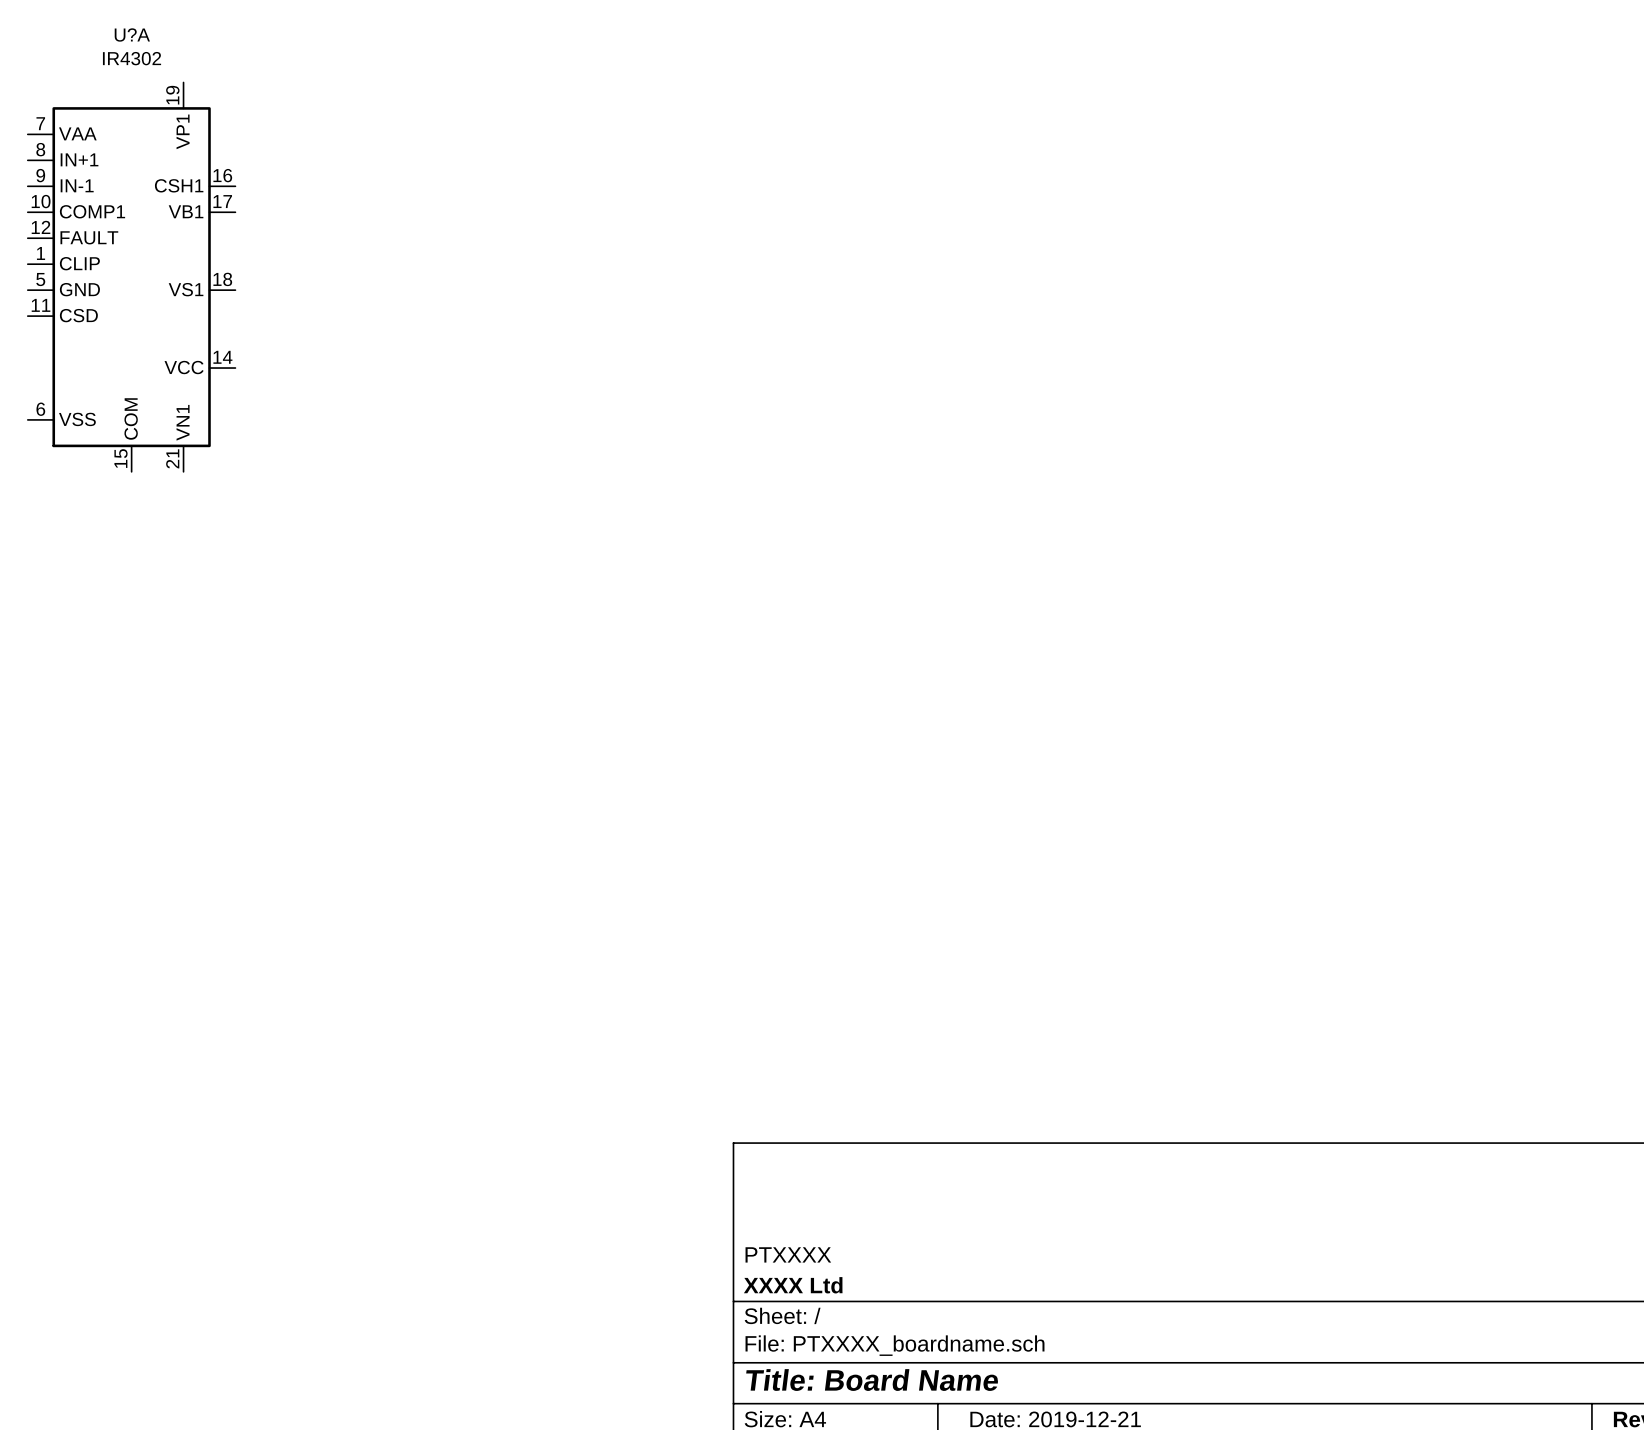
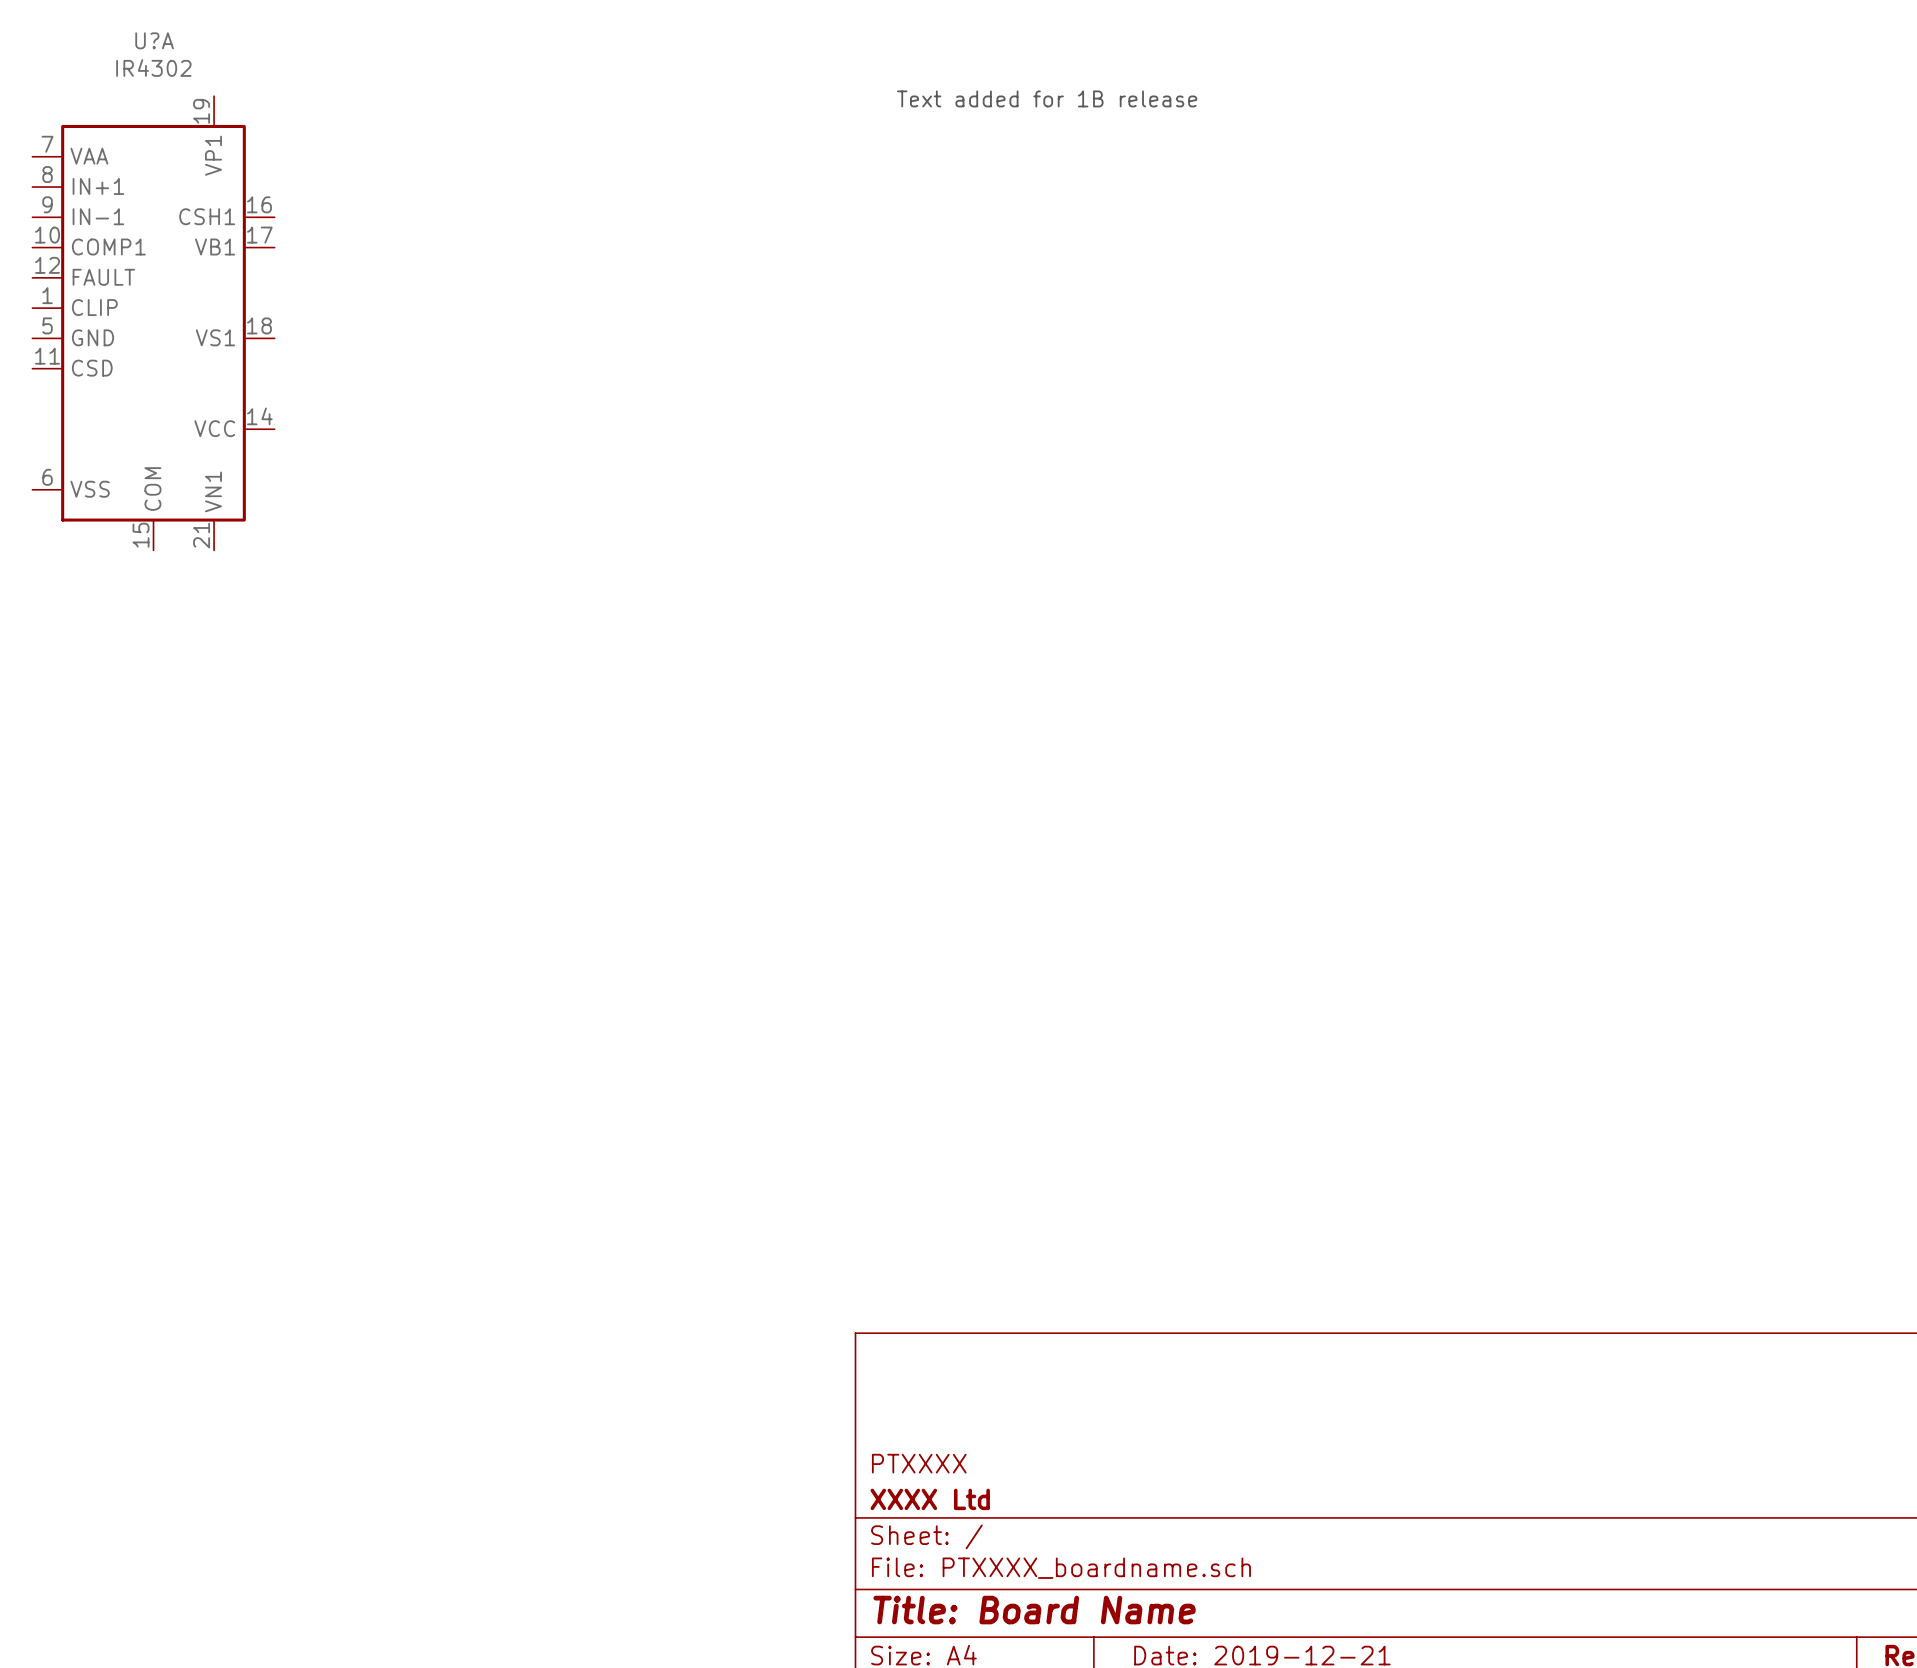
text: none -> Text added for 1B release (1047, 98)

